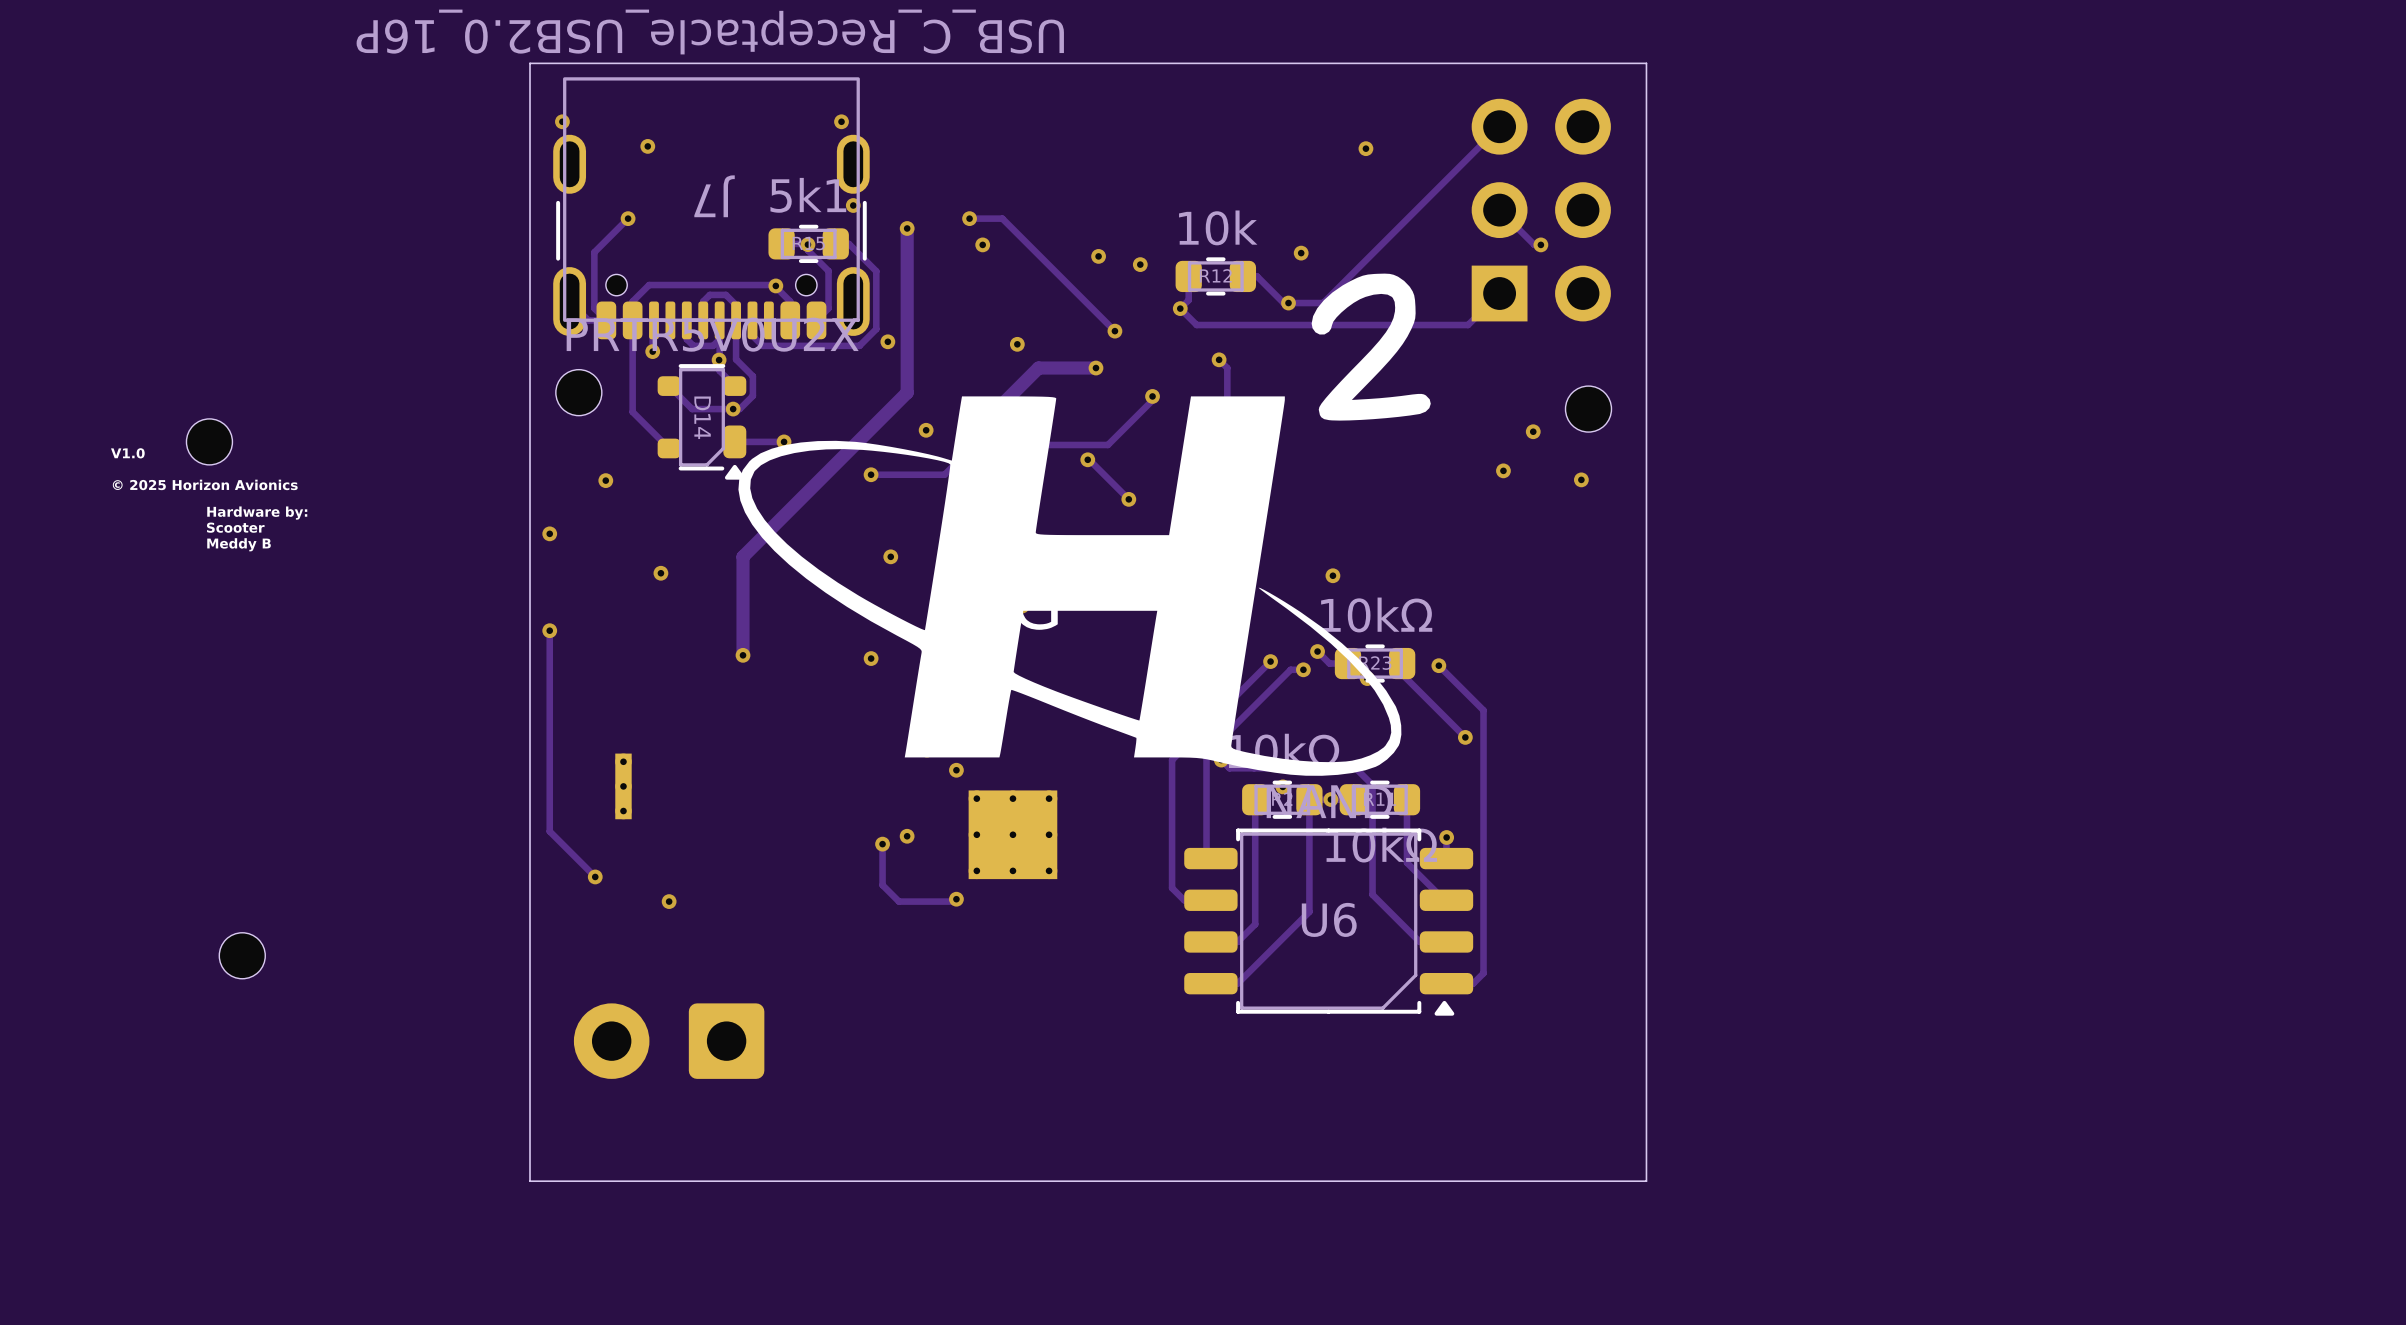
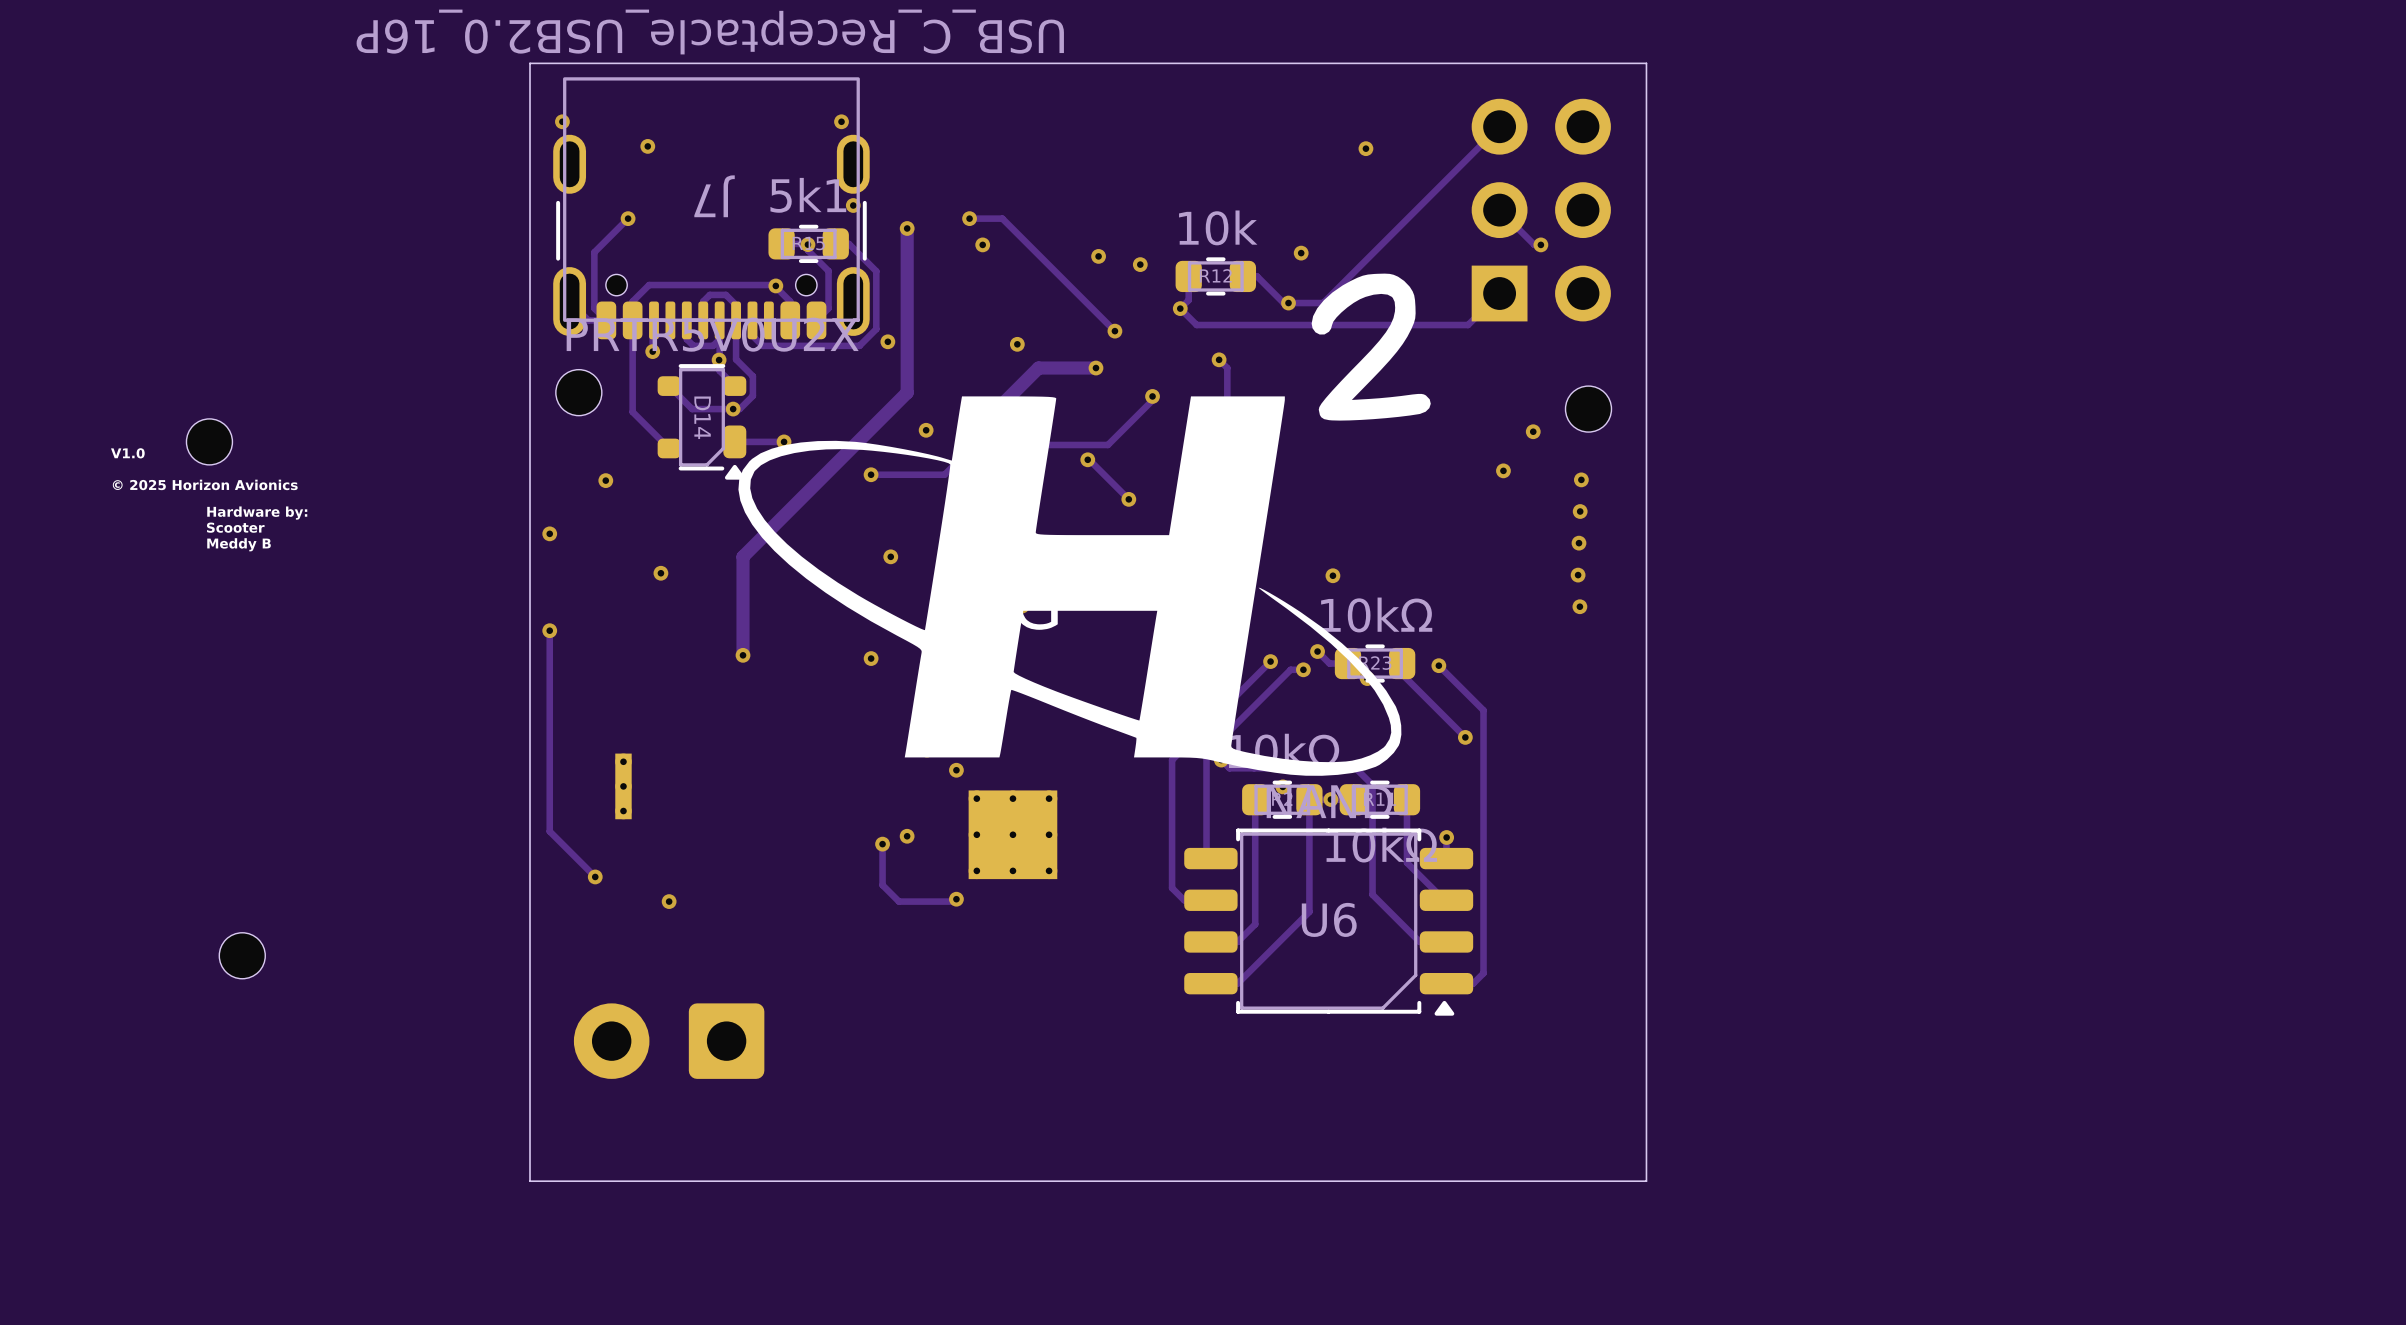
via: none -> (1580, 511)
via: none -> (1578, 543)
via: none -> (1578, 575)
via: none -> (1579, 606)

